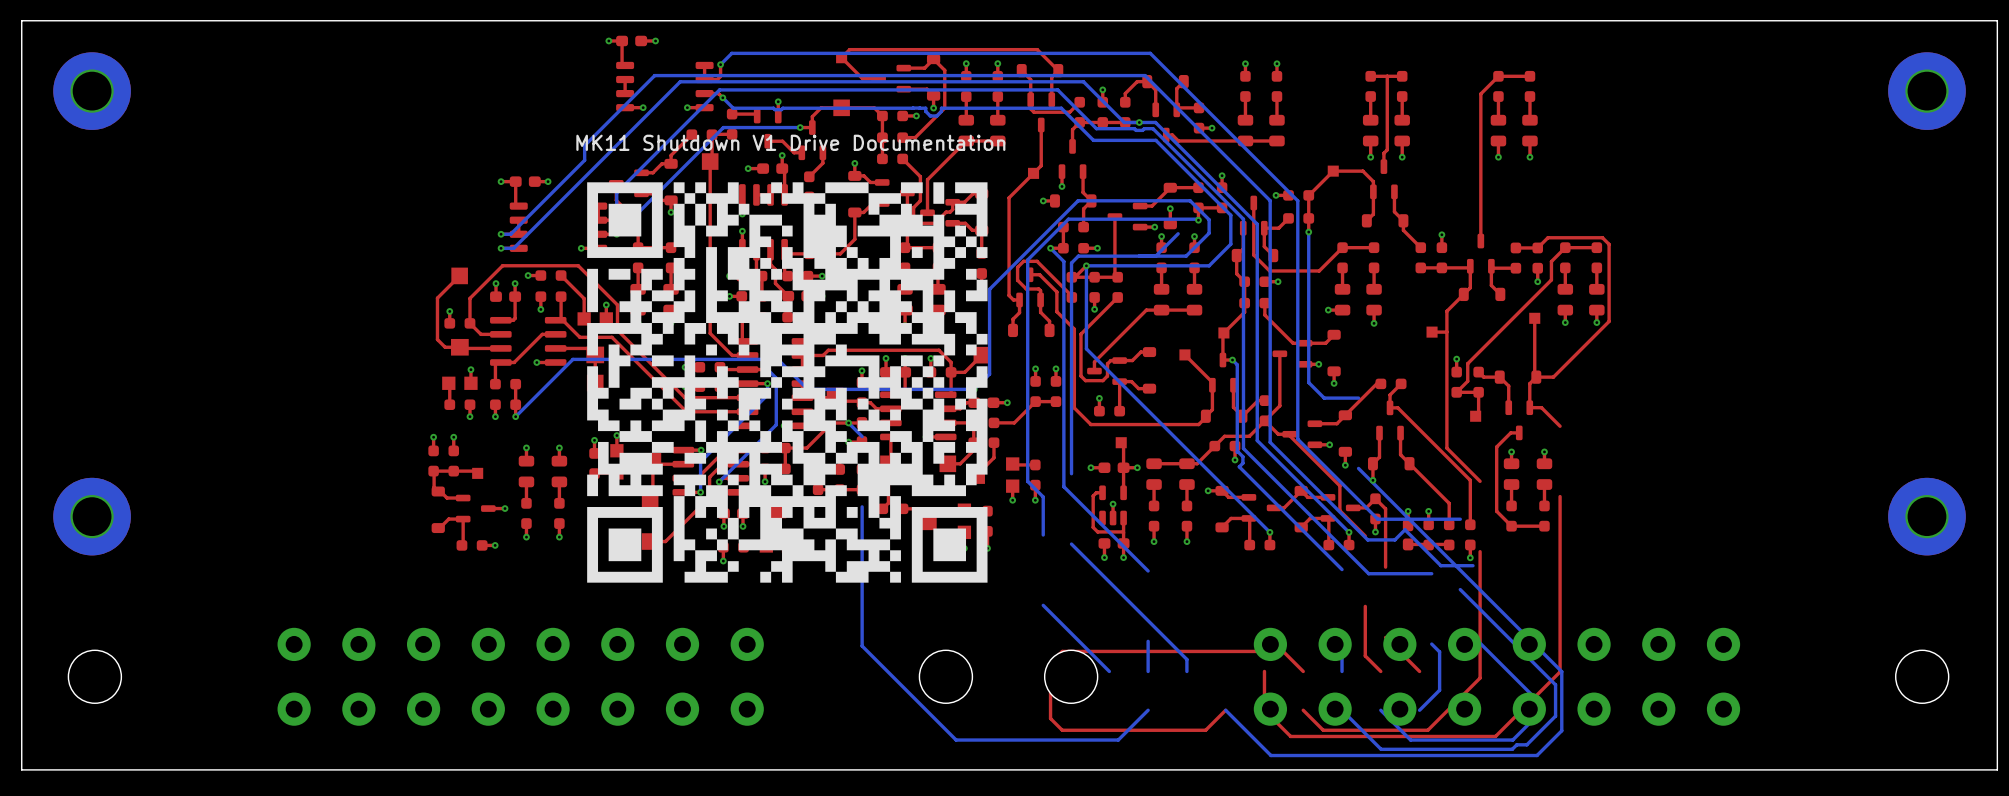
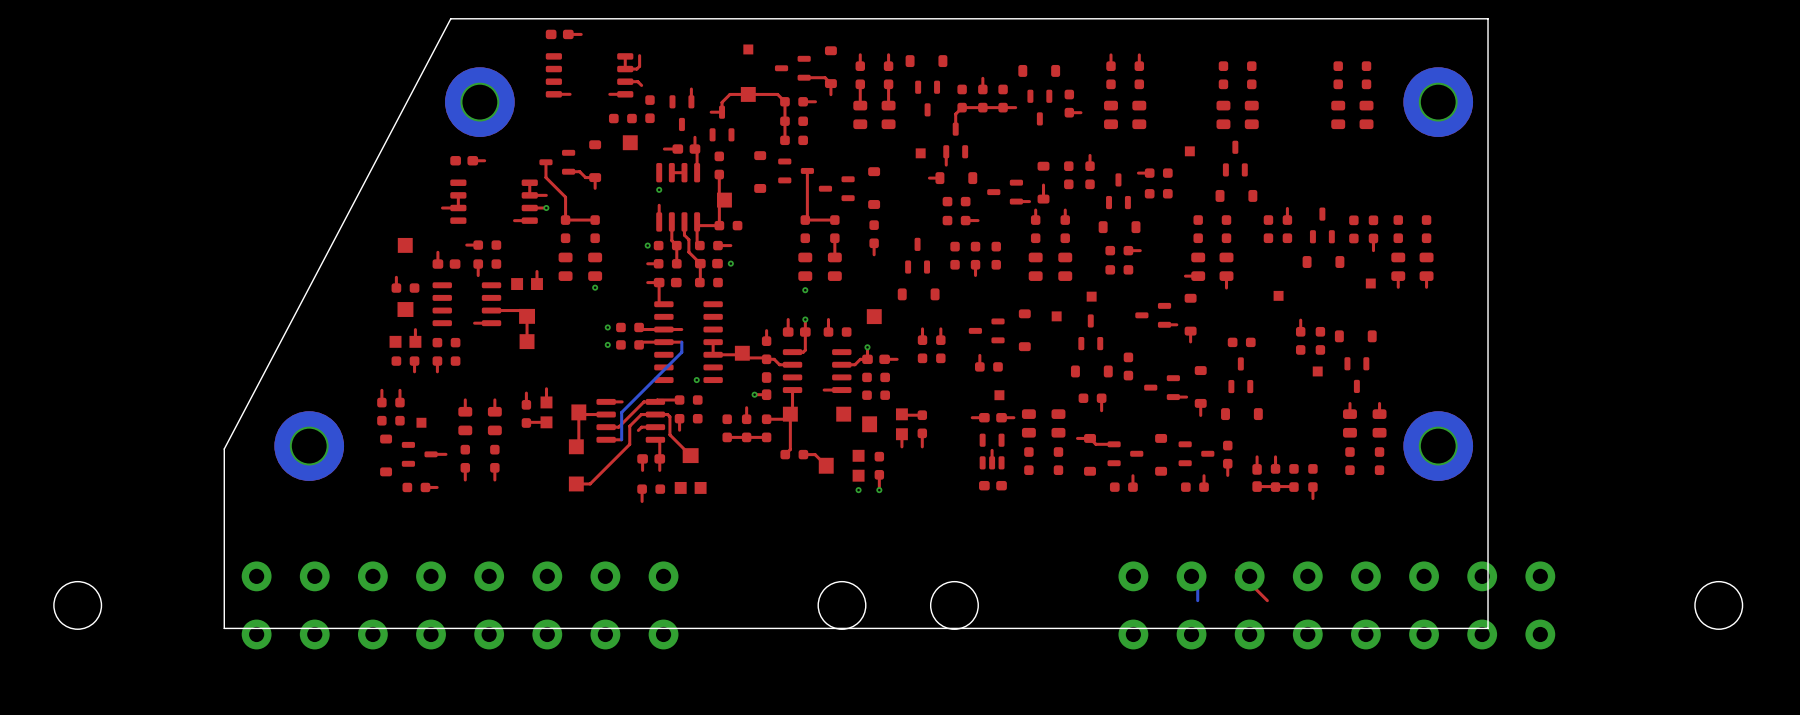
board edge: (21, 20) (21, 769) (1997, 769) (1997, 20) (21, 20) -> (1488, 18) (1488, 628) (224, 628) (224, 448) (450, 18) (1488, 18)
top track: (608, 40) (622, 40) (622, 65) (625, 65) -> none
via: (608, 40) -> none
via: (655, 40) -> none
via: (966, 63) -> none
via: (997, 63) -> none
via: (1245, 63) -> none
via: (1276, 63) -> none
bottom track: (720, 64) (731, 53) (1150, 53) (1297, 200) (1297, 439) (1377, 519) (1460, 519) -> none
via: (720, 64) -> none
top track: (903, 68) (924, 68) (933, 59) (944, 70) (944, 108) (915, 137) (902, 137) -> none
top track: (1021, 70) (1030, 79) (1030, 108) (1033, 112) (1069, 112) (1079, 102) -> none
top track: (1387, 76) (1387, 149) (1383, 153) (1383, 166) -> none
top track: (1402, 76) (1370, 76) -> none
top track: (1529, 76) (1498, 76) (1480, 93) (1480, 241) -> none
top track: (878, 78) (862, 78) (841, 57) (849, 49) (1037, 49) (1058, 70) (1051, 77) (1051, 99) -> none
top track: (625, 79) (625, 93) -> none
top track: (1183, 81) (1176, 88) (1176, 109) (1178, 107) (1199, 107) -> none
via: (1102, 89) -> none
part: (92, 91) -> none
part: (1926, 91) -> none
top track: (1245, 96) (1245, 120) -> none
top track: (1276, 96) (1276, 120) -> none
top track: (1370, 96) (1370, 120) -> none
top track: (1402, 96) (1402, 120) -> none
top track: (1498, 96) (1498, 120) -> none
top track: (1529, 96) (1529, 120) -> none
bottom track: (722, 97) (733, 108) (913, 108) -> none
via: (722, 97) -> none
via: (778, 101) -> none
top track: (1125, 102) (1125, 93) (1137, 81) (1147, 81) (1155, 90) (1155, 109) -> none
via: (643, 107) -> none
via: (687, 107) -> none
bottom track: (919, 108) (913, 108) -> none
bottom track: (919, 108) (925, 108) (925, 111) (930, 115) (936, 115) (941, 111) (941, 108) (1061, 108) (1093, 140) (1155, 140) (1230, 215) (1230, 244) (1209, 265) (1086, 265) (1086, 348) (1269, 532) -> none
via: (933, 108) -> none
top track: (732, 114) (755, 114) (757, 116) -> none
via: (916, 115) -> none
part: none -> (479, 102)
part: none -> (1438, 102)
via: (1139, 122) -> none
top track: (1041, 124) (1041, 165) (1009, 197) (1009, 295) (1013, 299) (1019, 299) (1019, 312) (1013, 319) (1013, 330) -> none
bottom track: (800, 127) (723, 127) (616, 234) -> none
via: (800, 127) -> none
via: (1212, 128) -> none
top track: (691, 134) (671, 155) (671, 163) (661, 163) (652, 172) (641, 172) -> none
top track: (732, 134) (712, 134) (712, 159) (710, 161) (710, 333) (732, 355) (747, 355) -> none
top track: (1166, 135) (1172, 135) (1178, 140) (1276, 140) -> none
top track: (997, 140) (966, 140) (927, 179) (927, 212) -> none
top track: (1370, 140) (1370, 157) -> none
top track: (1402, 140) (1402, 157) -> none
top track: (1498, 140) (1498, 157) -> none
top track: (1529, 140) (1529, 157) -> none
top track: (767, 141) (782, 141) (794, 152) (801, 152) -> none
text: MK11 Shutdown V1 Drive Documentation (790, 142) -> none
top track: (822, 152) (822, 163) (809, 176) -> none
via: (782, 155) -> none
via: (1370, 157) -> none
via: (1402, 157) -> none
via: (1498, 157) -> none
via: (1529, 157) -> none
top track: (902, 158) (920, 176) (920, 200) (913, 207) (913, 215) (920, 223) (934, 223) (946, 212) (952, 209) (952, 202) (964, 202) (973, 193) (981, 193) -> none
top track: (854, 163) (854, 175) (863, 175) (870, 182) (882, 182) -> none
via: (854, 163) -> none
via: (748, 168) -> none
top track: (1083, 171) (1083, 192) (1091, 200) (1083, 208) (1083, 227) -> none
via: (1222, 175) -> none
top track: (501, 181) (515, 181) (515, 206) (518, 206) -> none
via: (501, 181) -> none
via: (548, 181) -> none
drawing: [587, 182, 988, 583] -> none
via: (1062, 186) -> none
top track: (1198, 187) (1170, 187) (1152, 206) (1140, 206) -> none
top track: (1394, 191) (1394, 211) (1403, 220) (1403, 230) (1420, 247) -> none
via: (1276, 195) -> none
via: (1043, 200) -> none
top track: (1253, 202) (1253, 255) (1269, 270) (1319, 270) (1342, 247) (1374, 247) -> none
top track: (882, 203) (872, 203) (863, 212) (854, 212) (854, 239) (840, 253) (829, 253) -> none
top track: (1222, 207) (1198, 207) (1198, 220) -> none
via: (1170, 208) -> none
via: (671, 212) -> none
top track: (1114, 216) (1114, 274) (1117, 277) (1071, 277) -> none
top track: (1288, 218) (1278, 228) (1264, 228) (1264, 246) (1273, 255) -> none
bottom track: (616, 220) (616, 192) (719, 89) (1057, 89) (1096, 128) (1134, 128) (1136, 130) (1152, 128) (1243, 219) (1243, 448) (1368, 573) (1431, 573) -> none
bottom track: (1198, 220) (1068, 219) (1027, 259) (1027, 481) (1043, 496) (1043, 535) -> none
via: (1198, 220) -> none
top track: (1366, 220) (1373, 214) (1373, 181) (1362, 171) (1333, 171) (1308, 195) (1308, 232) -> none
top track: (952, 223) (965, 223) (972, 230) (981, 230) (981, 253) -> none
top track: (1063, 227) (1063, 248) (1050, 248) -> none
via: (1154, 227) -> none
top track: (1243, 228) (1243, 249) (1236, 255) (1236, 273) (1244, 281) (1244, 312) (1222, 333) (1222, 360) (1232, 360) -> none
via: (742, 231) -> none
bottom track: (1308, 232) (1308, 382) (1324, 398) (1358, 398) -> none
via: (1308, 232) -> none
bottom track: (1178, 233) (1155, 256) -> none
bottom track: (501, 234) (510, 234) (584, 160) (584, 145) (654, 75) (1145, 75) (1270, 200) (1270, 442) (1367, 539) (1394, 539) (1405, 529) (1440, 565) (1472, 565) -> none
via: (501, 234) -> none
via: (1441, 234) -> none
via: (1161, 236) -> none
via: (1194, 236) -> none
top track: (1515, 247) (1537, 247) (1547, 237) (1602, 237) (1609, 244) (1609, 321) (1553, 377) (1536, 377) -> none
top track: (1596, 247) (1565, 247) (1551, 261) (1551, 279) (1467, 363) (1467, 381) (1456, 392) (1478, 392) (1478, 413) (1475, 416) -> none
bottom track: (501, 248) (513, 248) (680, 81) (1083, 81) (1124, 122) (1155, 122) (1257, 224) (1257, 440) (1349, 532) -> none
via: (501, 248) -> none
via: (581, 248) -> none
bottom track: (1050, 248) (1063, 261) (1063, 486) (1148, 570) -> none
via: (1050, 248) -> none
via: (1097, 248) -> none
top track: (1086, 265) (1075, 277) -> none
via: (1086, 265) -> none
top track: (638, 267) (638, 289) -> none
top track: (671, 267) (671, 289) -> none
top track: (1161, 267) (1161, 289) -> none
top track: (1194, 267) (1194, 289) -> none
top track: (1342, 267) (1342, 289) -> none
top track: (1374, 267) (1374, 289) -> none
top track: (1420, 267) (1468, 267) (1470, 266) (1470, 287) (1446, 311) (1446, 448) (1480, 481) -> none
top track: (1565, 267) (1565, 289) -> none
top track: (1596, 267) (1596, 289) -> none
top track: (1515, 268) (1493, 268) (1491, 266) (1491, 285) (1500, 294) -> none
top track: (1030, 274) (1039, 274) (1056, 292) (1056, 311) (1074, 329) (1074, 407) (1090, 424) (1198, 424) (1212, 409) (1212, 382) (1184, 354) -> none
top track: (459, 275) (437, 298) (437, 339) (445, 347) (500, 348) -> none
via: (528, 275) -> none
top track: (561, 275) (584, 298) (584, 318) -> none
via: (822, 276) -> none
via: (1278, 281) -> none
via: (1537, 281) -> none
via: (495, 283) -> none
top track: (515, 283) (515, 318) (513, 320) (500, 320) -> none
via: (515, 283) -> none
top track: (561, 296) (561, 320) -> none
via: (729, 296) -> none
top track: (1071, 297) (1037, 261) (1023, 261) (1017, 267) (1017, 280) (1026, 288) (1038, 288) (1040, 290) (1040, 312) (1049, 321) (1049, 330) -> none
top track: (1117, 297) (1080, 334) (1080, 376) (1085, 380) (1102, 380) (1107, 376) (1107, 363) (1110, 360) (1132, 360) (1140, 352) (1149, 352) -> none
top track: (1264, 303) (1264, 315) (1293, 343) (1325, 343) (1334, 334) -> none
via: (606, 304) -> none
via: (540, 309) -> none
via: (1094, 309) -> none
top track: (905, 310) (905, 325) -> none
top track: (1194, 310) (1146, 310) (1094, 362) (1094, 371) -> none
via: (1328, 310) -> none
via: (449, 311) -> none
top track: (1534, 318) (1534, 374) (1536, 377) -> none
top track: (555, 320) (562, 320) (579, 337) (611, 337) (686, 411) (747, 411) -> none
via: (1565, 322) -> none
via: (1596, 322) -> none
via: (1374, 323) -> none
top track: (1446, 332) (1432, 332) -> none
top track: (500, 334) (480, 334) (469, 323) (469, 298) (502, 265) (578, 265) (617, 304) (617, 330) (684, 397) (747, 397) -> none
top track: (555, 334) (542, 334) (514, 362) (495, 362) (495, 384) -> none
top track: (1279, 353) (1279, 405) (1249, 436) (1224, 436) (1197, 463) (1154, 463) -> none
top track: (981, 355) (964, 372) (951, 372) -> none
via: (886, 358) -> none
via: (930, 358) -> none
via: (1456, 359) -> none
bottom track: (1232, 360) (1237, 364) (1237, 452) (1242, 456) (1242, 463) (1239, 466) (1342, 569) -> none
via: (1232, 360) -> none
via: (536, 362) -> none
via: (1318, 364) -> none
via: (1035, 368) -> none
via: (1055, 368) -> none
via: (470, 369) -> none
bottom track: (767, 369) (776, 378) (776, 424) (719, 481) -> none
top track: (802, 369) (802, 355) (823, 355) (828, 350) (938, 350) (951, 362) (951, 394) (945, 394) -> none
via: (861, 370) -> none
top track: (1478, 372) (1483, 377) (1499, 377) (1508, 386) (1508, 407) -> none
top track: (1536, 377) (1529, 383) (1529, 407) (1541, 407) (1560, 426) -> none
top track: (448, 383) (449, 404) -> none
via: (767, 383) -> none
via: (1334, 383) -> none
top track: (1380, 383) (1376, 383) (1336, 423) (1314, 423) -> none
top track: (1401, 383) (1390, 394) (1390, 407) (1397, 407) (1470, 480) (1470, 524) -> none
top track: (515, 384) (515, 416) -> none
top track: (1233, 385) (1233, 407) (1242, 416) (1258, 400) (1264, 400) -> none
top track: (1149, 388) (1138, 388) (1131, 381) (1119, 381) (1119, 411) -> none
via: (1099, 398) -> none
top track: (1055, 401) (1035, 401) (1014, 422) (993, 422) -> none
via: (1007, 402) -> none
via: (469, 416) -> none
via: (495, 416) -> none
bottom track: (515, 416) (572, 359) (777, 359) (807, 389) (974, 389) (989, 374) (989, 289) (1078, 200) (1190, 200) (1209, 219) (1209, 233) (1186, 256) (1078, 256) (1071, 263) (1071, 473) -> none
via: (515, 416) -> none
top track: (1264, 420) (1278, 434) (1289, 434) (1339, 485) (1339, 510) (1365, 536) -> none
top track: (945, 422) (973, 422) (973, 450) (960, 463) (947, 463) -> none
bottom track: (848, 423) (862, 436) -> none
via: (848, 423) -> none
top track: (861, 423) (831, 423) (806, 448) (785, 448) (785, 468) -> none
top track: (1519, 432) (1510, 432) (1496, 446) (1496, 511) (1511, 526) (1544, 526) -> none
top track: (1379, 433) (1379, 457) (1372, 463) (1372, 480) -> none
top track: (1400, 433) (1400, 454) (1449, 503) (1449, 524) -> none
via: (616, 435) -> none
via: (433, 437) -> none
via: (453, 437) -> none
via: (594, 440) -> none
top track: (993, 442) (993, 457) (976, 475) -> none
top track: (1121, 442) (1123, 445) (1123, 492) -> none
via: (1329, 444) -> none
via: (526, 447) -> none
via: (559, 447) -> none
via: (701, 450) -> none
via: (1511, 451) -> none
via: (1544, 451) -> none
via: (1235, 459) -> none
via: (1345, 465) -> none
via: (1090, 467) -> none
via: (1137, 467) -> none
bottom track: (1358, 468) (1561, 671) (1561, 730) (1537, 755) (1270, 755) (1225, 710) -> none
top track: (477, 473) (475, 471) (433, 471) (434, 487) (438, 491) (447, 498) (463, 498) -> none
via: (1372, 480) -> none
top track: (526, 481) (526, 503) -> none
top track: (559, 481) (559, 503) -> none
via: (719, 481) -> none
via: (765, 481) -> none
top track: (1154, 484) (1154, 505) -> none
top track: (1186, 484) (1186, 505) -> none
top track: (1511, 484) (1511, 505) -> none
top track: (1544, 484) (1544, 505) -> none
via: (1208, 490) -> none
via: (700, 492) -> none
top track: (1102, 492) (1096, 492) (1093, 495) (1093, 527) (1097, 531) (1122, 531) -> none
top track: (1560, 496) (1560, 671) (1495, 736) (1290, 736) (1264, 710) (1264, 671) -> none
top track: (1328, 497) (1307, 497) (1301, 490) (1284, 507) (1274, 507) -> none
part: none -> (309, 446)
part: none -> (1438, 446)
via: (1012, 500) -> none
via: (1035, 500) -> none
via: (1113, 504) -> none
bottom track: (862, 506) (862, 646) (956, 740) (1118, 740) (1148, 710) -> none
top track: (1353, 507) (1366, 507) (1375, 498) (1385, 508) (1385, 567) -> none
via: (505, 508) -> none
via: (1408, 511) -> none
via: (1428, 511) -> none
part: (92, 516) -> none
part: (1926, 516) -> none
top track: (1123, 518) (1123, 557) -> none
via: (723, 526) -> none
via: (743, 526) -> none
top track: (1154, 526) (1154, 541) -> none
top track: (1186, 526) (1186, 541) -> none
top track: (1222, 527) (1231, 518) (1248, 518) (1249, 545) -> none
top track: (1301, 527) (1310, 518) (1328, 518) (1328, 545) -> none
top track: (438, 528) (448, 519) (463, 519) (461, 545) -> none
via: (1269, 532) -> none
via: (1349, 532) -> none
via: (1375, 532) -> none
via: (526, 537) -> none
via: (559, 537) -> none
via: (1154, 541) -> none
via: (1186, 541) -> none
top track: (1104, 543) (1104, 557) -> none
bottom track: (1071, 544) (1186, 659) (1186, 671) -> none
via: (495, 545) -> none
top track: (1480, 551) (1480, 678) (1427, 730) (1323, 730) (1303, 710) -> none
via: (1104, 557) -> none
via: (1123, 557) -> none
via: (1470, 557) -> none
via: (723, 561) -> none
bottom track: (1460, 589) (1555, 684) (1555, 716) (1526, 744) (1516, 744) (1512, 749) (1381, 749) (1342, 710) -> none
bottom track: (1043, 605) (1109, 671) -> none
top track: (1365, 606) (1365, 655) (1380, 671) -> none
bottom track: (1472, 636) (1538, 701) (1538, 714) (1512, 740) (1410, 740) (1380, 710) -> none
bottom track: (1148, 641) (1148, 671) -> none
bottom track: (1431, 644) (1439, 651) (1439, 690) (1419, 710) -> none
top track: (1303, 671) (1283, 651) (1062, 651) (1050, 663) (1050, 718) (1062, 730) (1205, 730) (1225, 710) -> none

